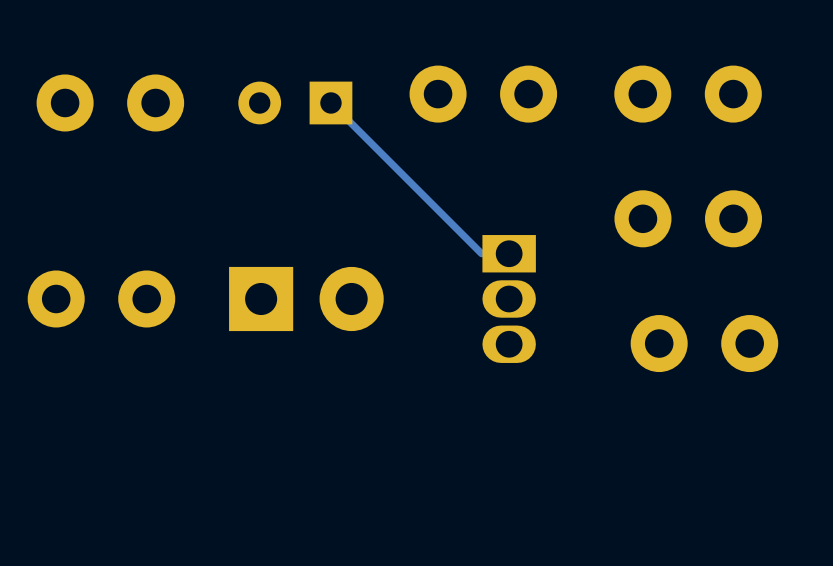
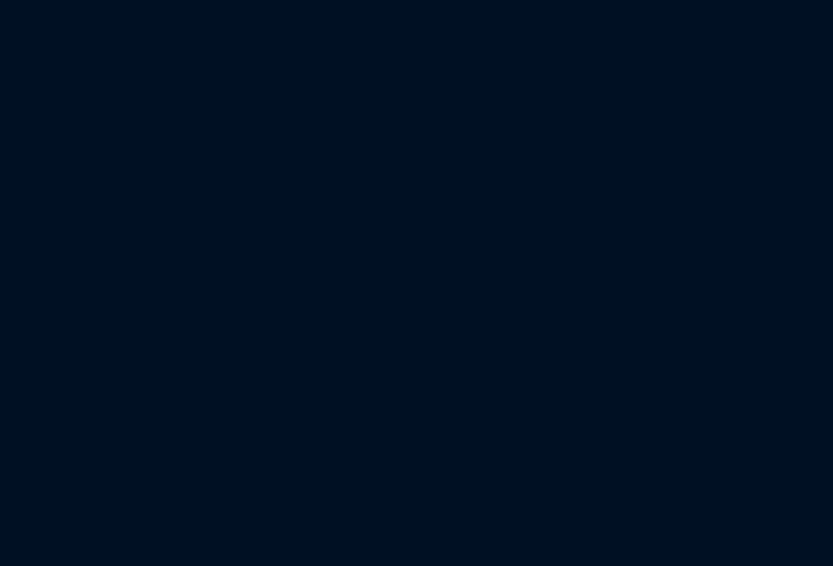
part: (483, 94) -> none
part: (688, 94) -> none
part: (110, 102) -> none
part: (295, 102) -> none
track: (330, 102) (481, 253) -> none
part: (688, 218) -> none
part: (101, 298) -> none
part: (306, 298) -> none
part: (509, 298) -> none
part: (704, 343) -> none

